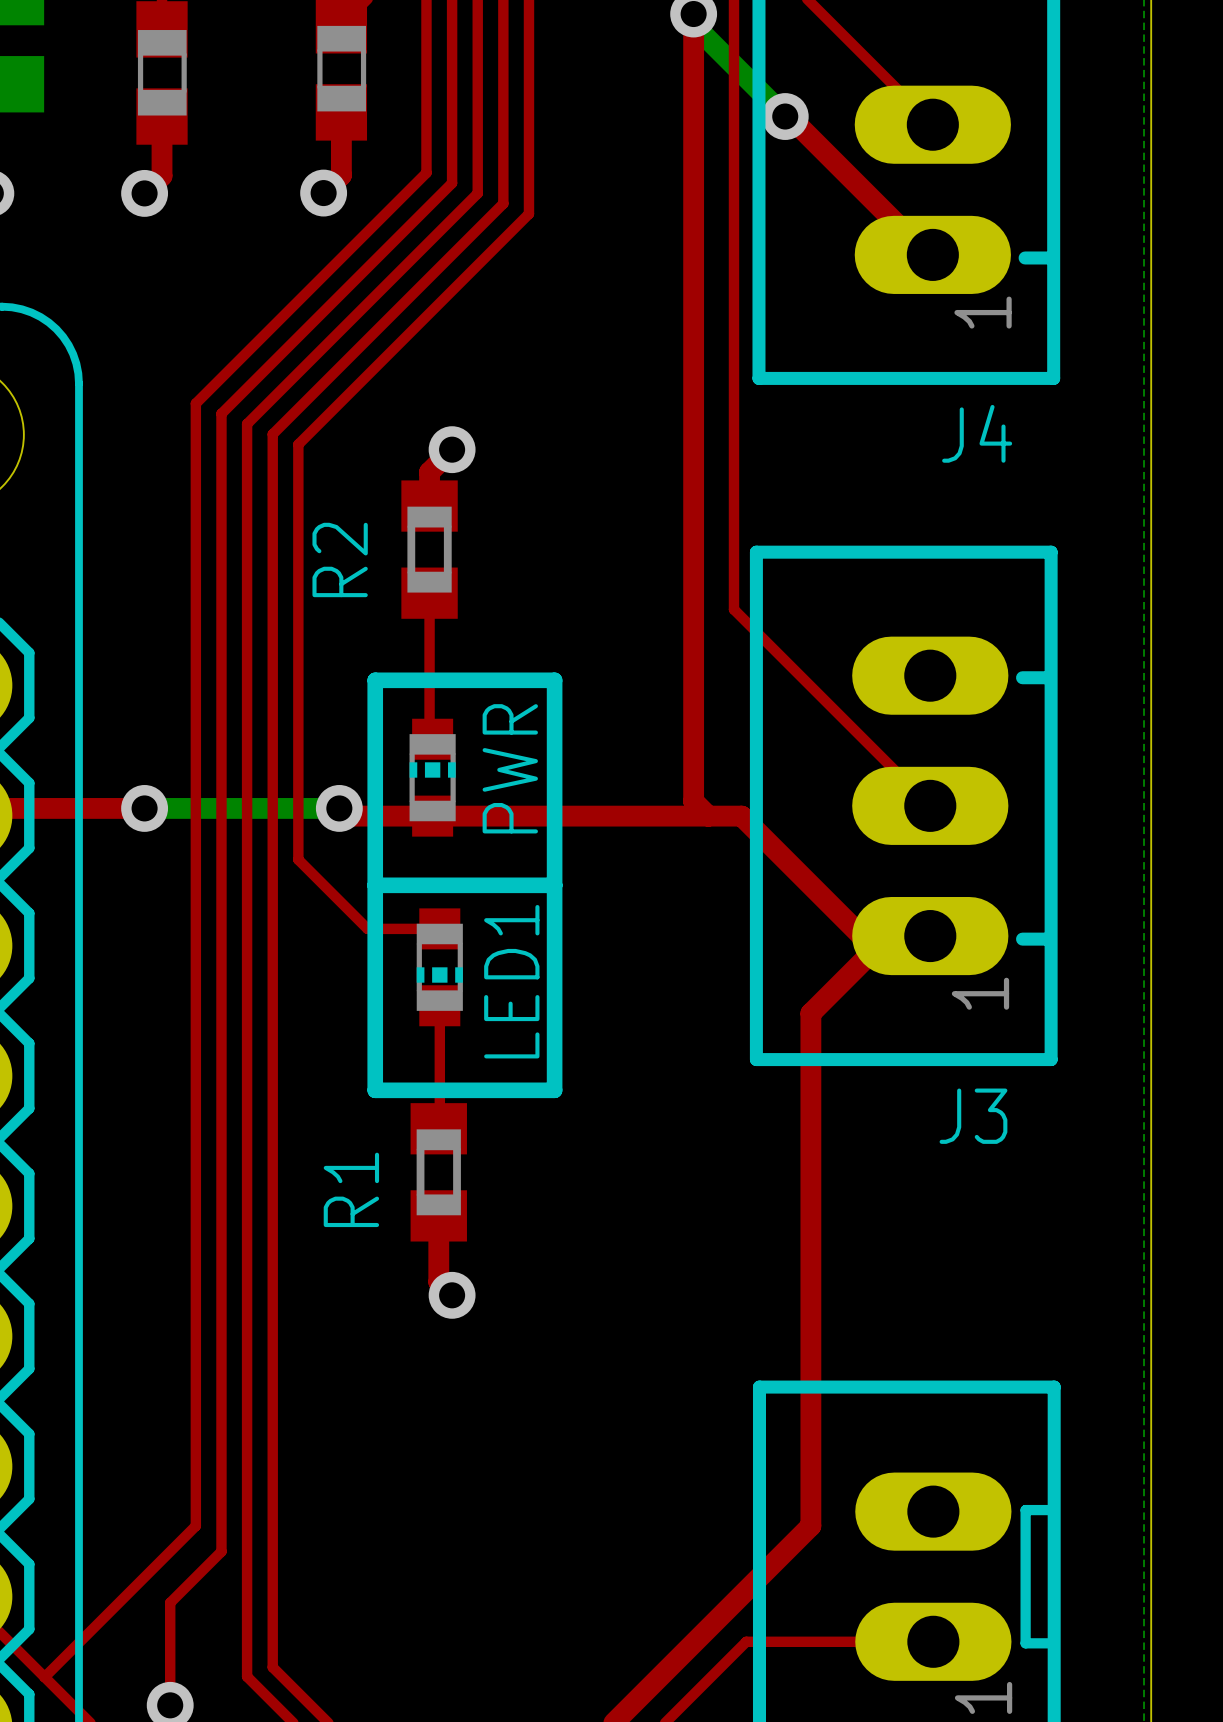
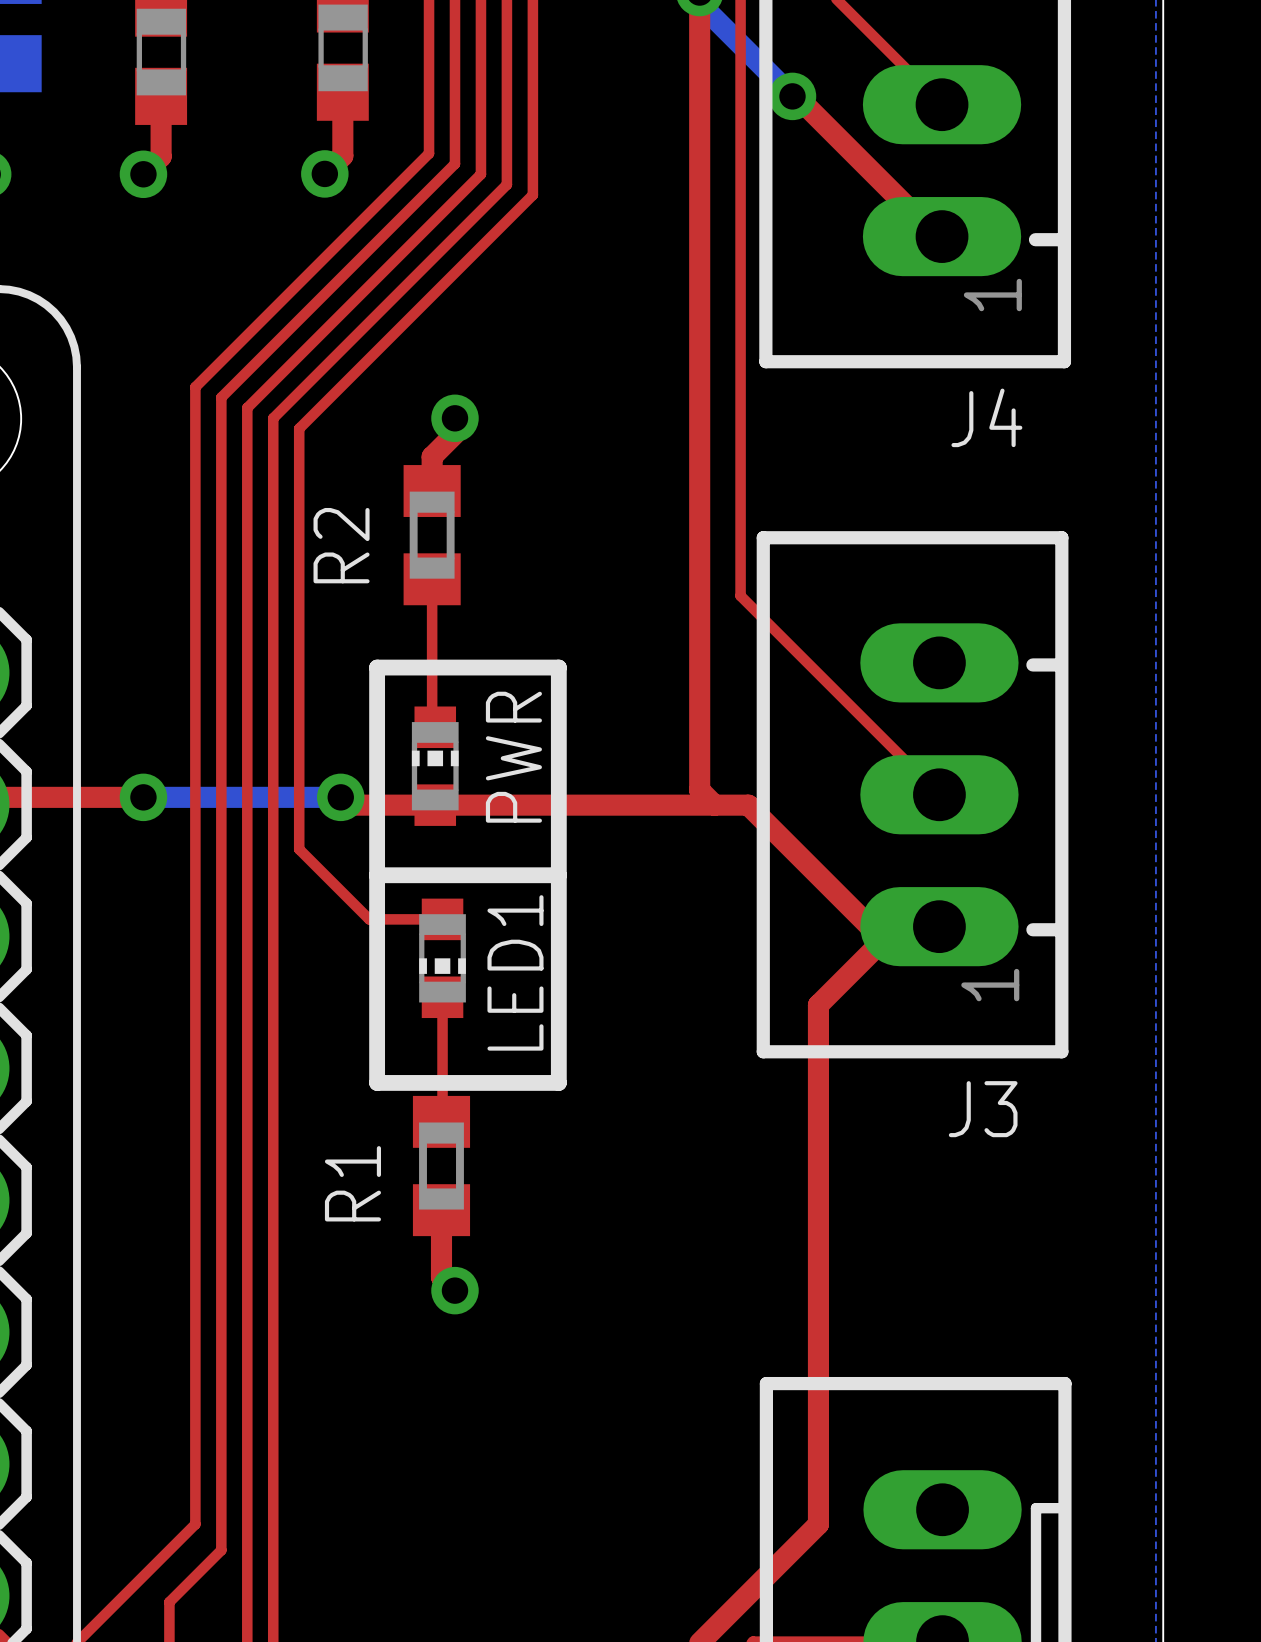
via position: (452, 449) -> (454, 418)

